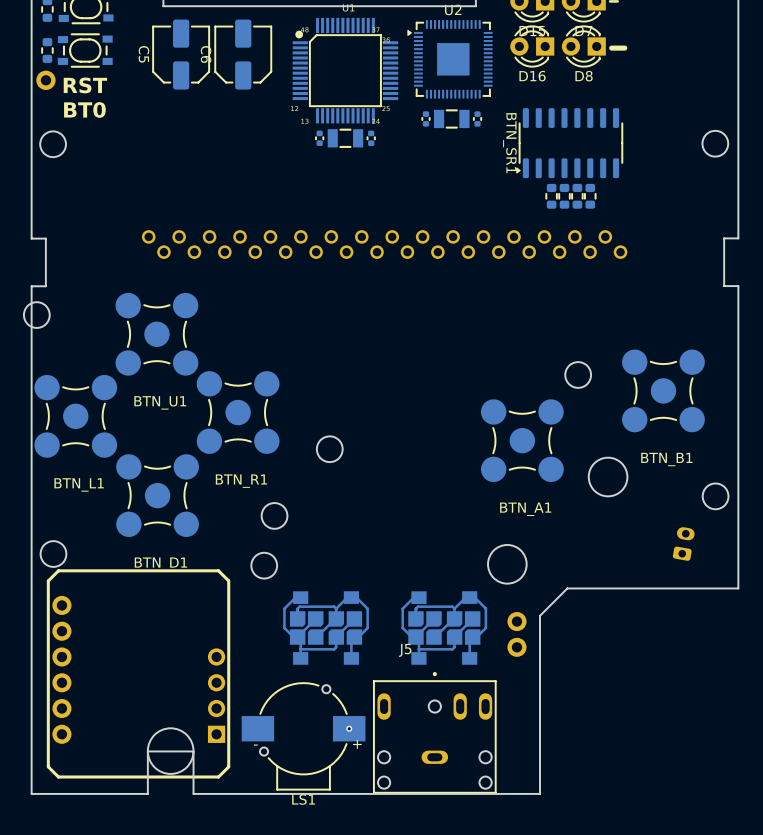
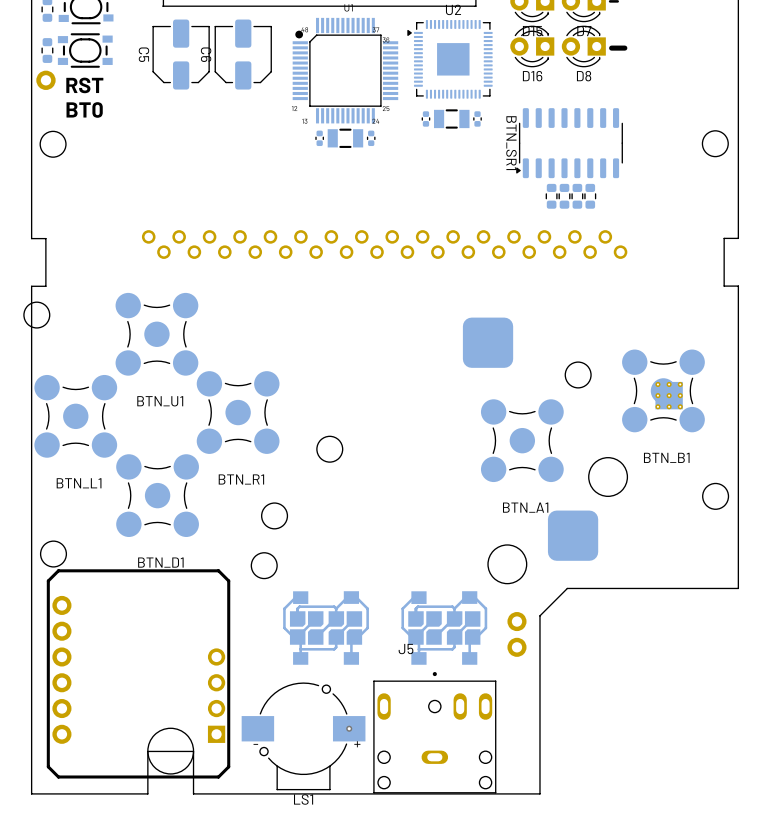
part: none -> (488, 342)
part: none -> (669, 395)
part: none -> (573, 535)
part: (683, 544) -> none

